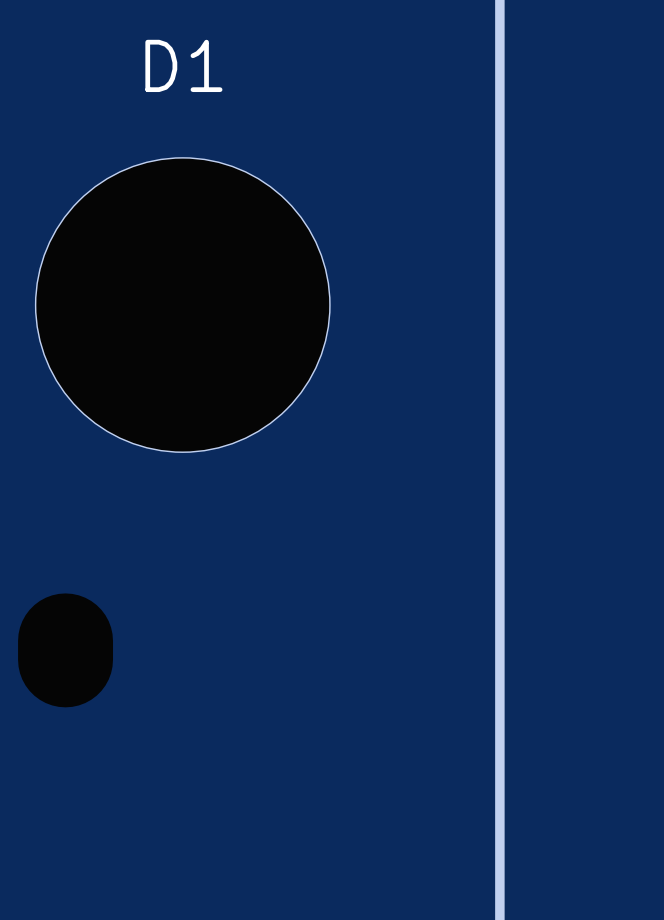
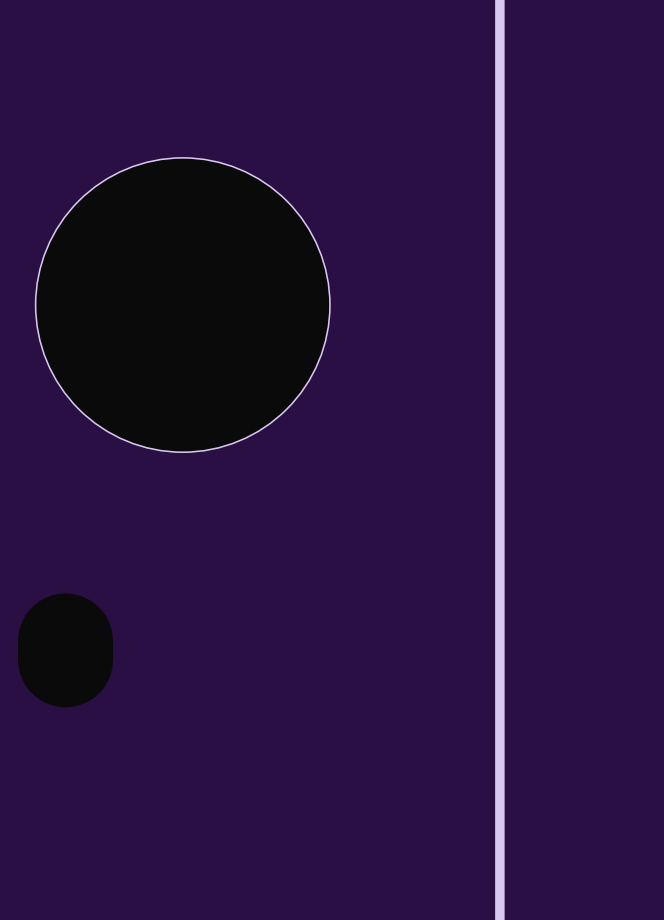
D1 name: D1 (183, 65) -> none

